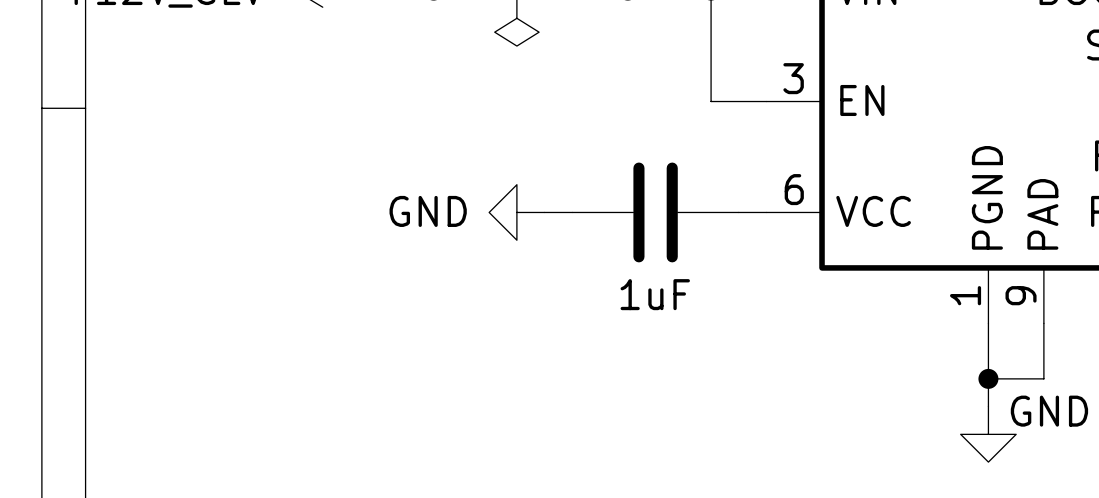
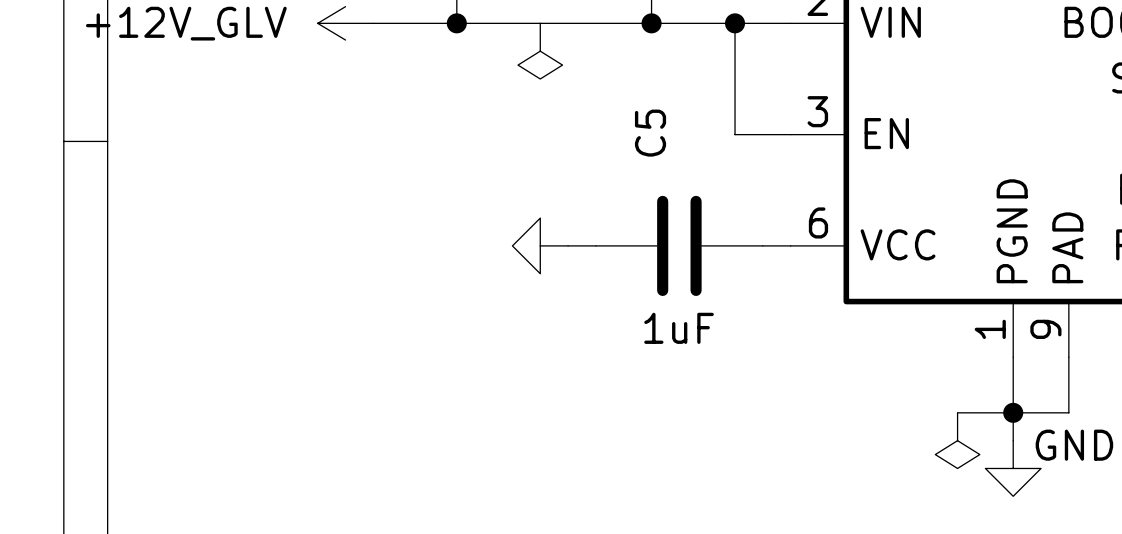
C5 name: none -> C5 (650, 133)
power symbol text: GND (428, 211) -> none
wire: none -> (957, 412) (1013, 412)
power symbol: none -> (957, 440)

